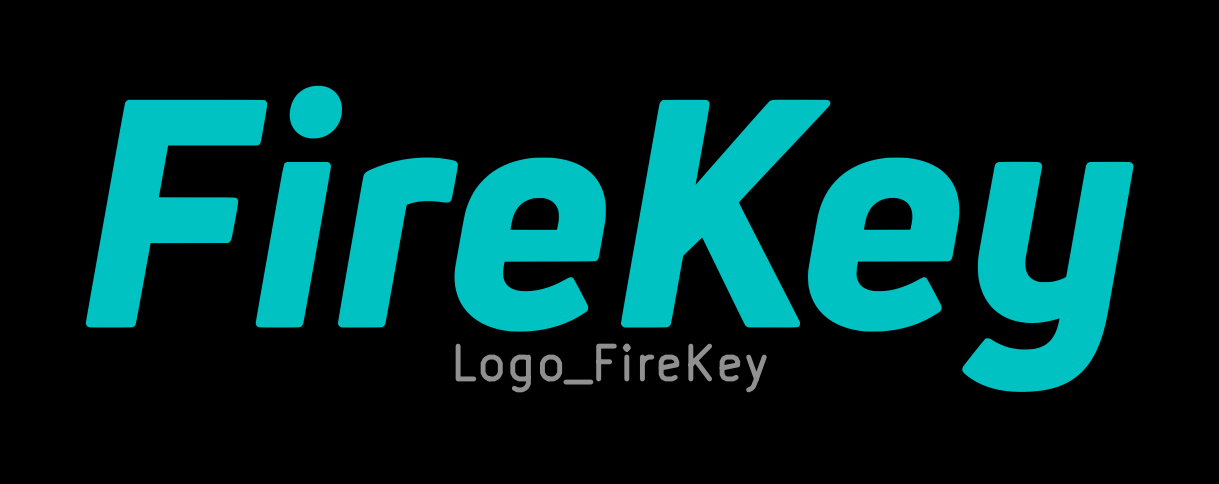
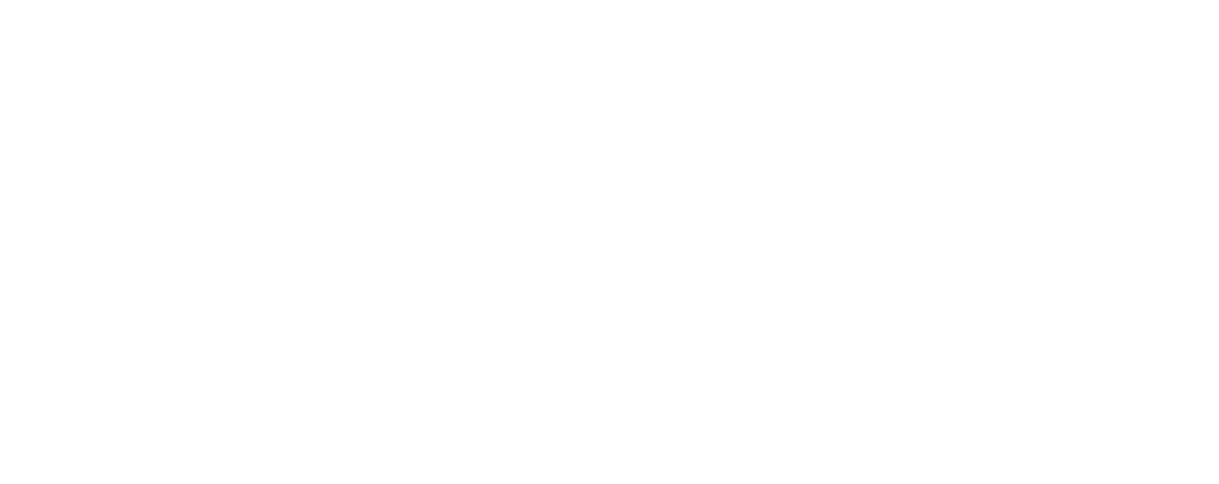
drawing: [85, 85, 1134, 392] -> none

